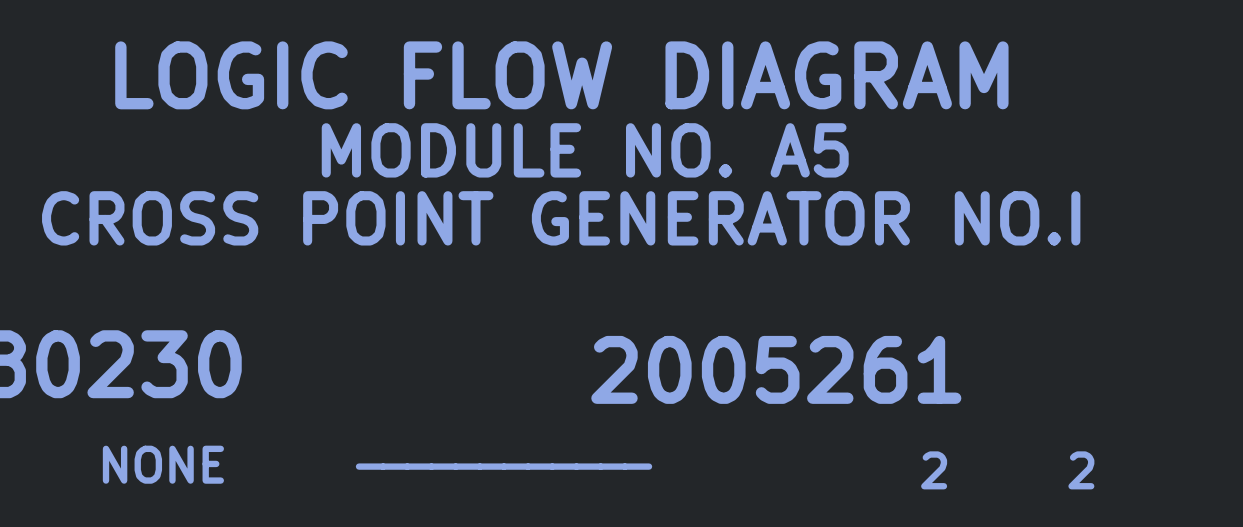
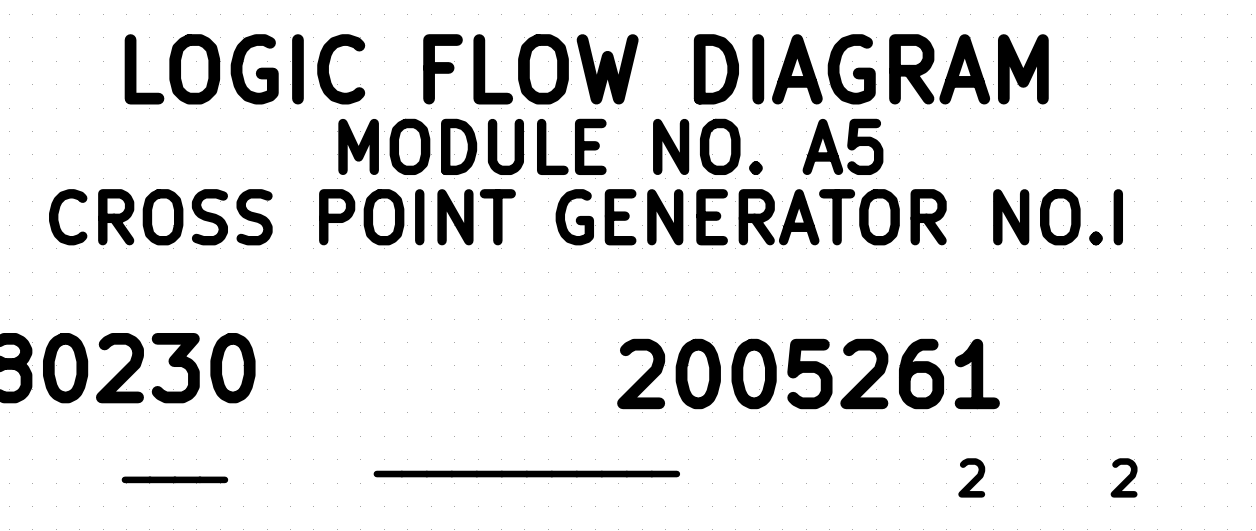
text: NONE (163, 464) -> none
text: none -> ____ (174, 479)

